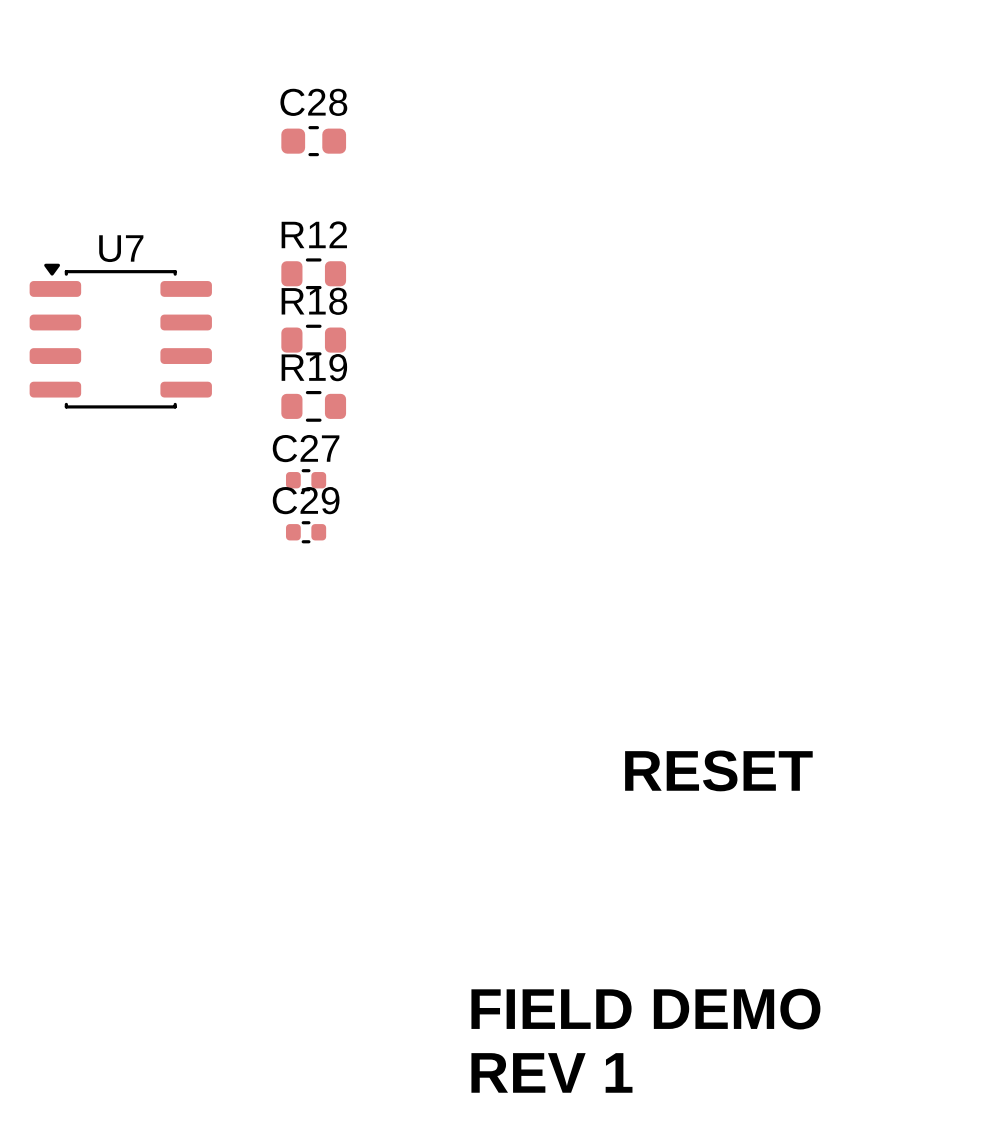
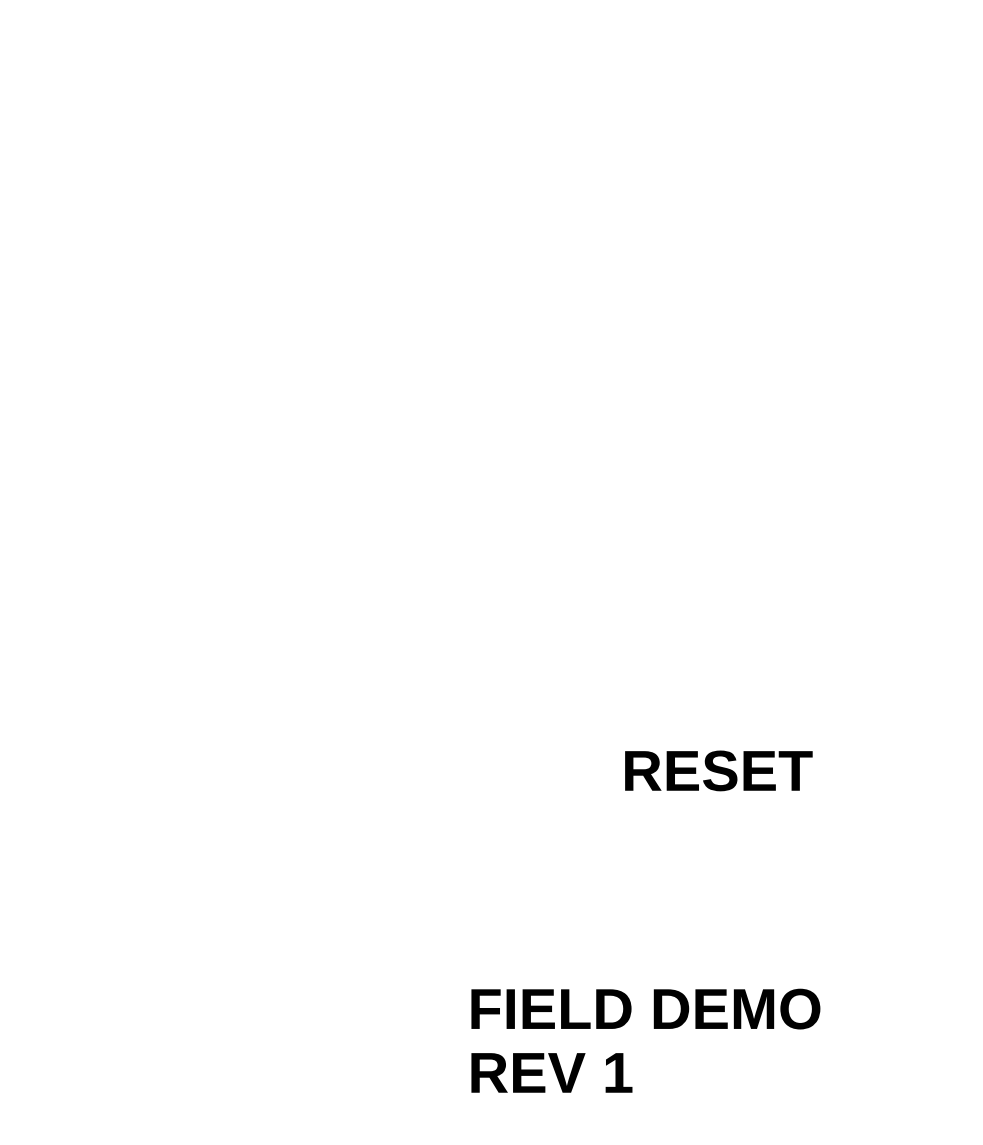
C28: (313, 141) -> none
R12: (313, 273) -> none
U7: (120, 336) -> none
R18: (313, 340) -> none
R19: (313, 406) -> none
C27: (306, 480) -> none
C29: (306, 532) -> none

